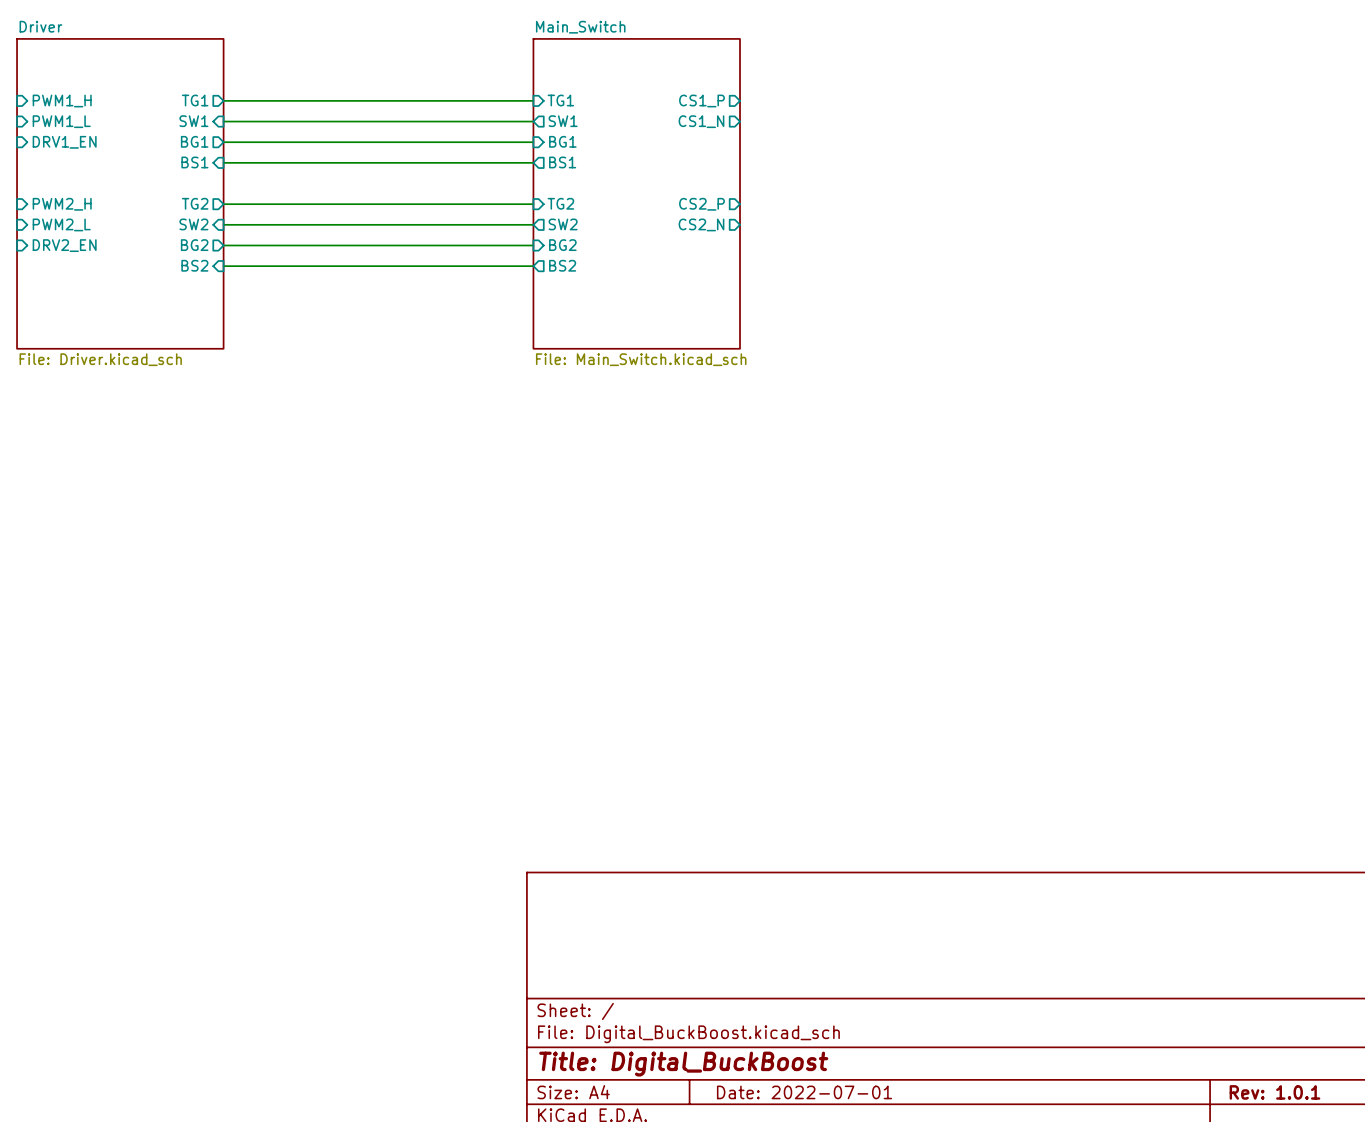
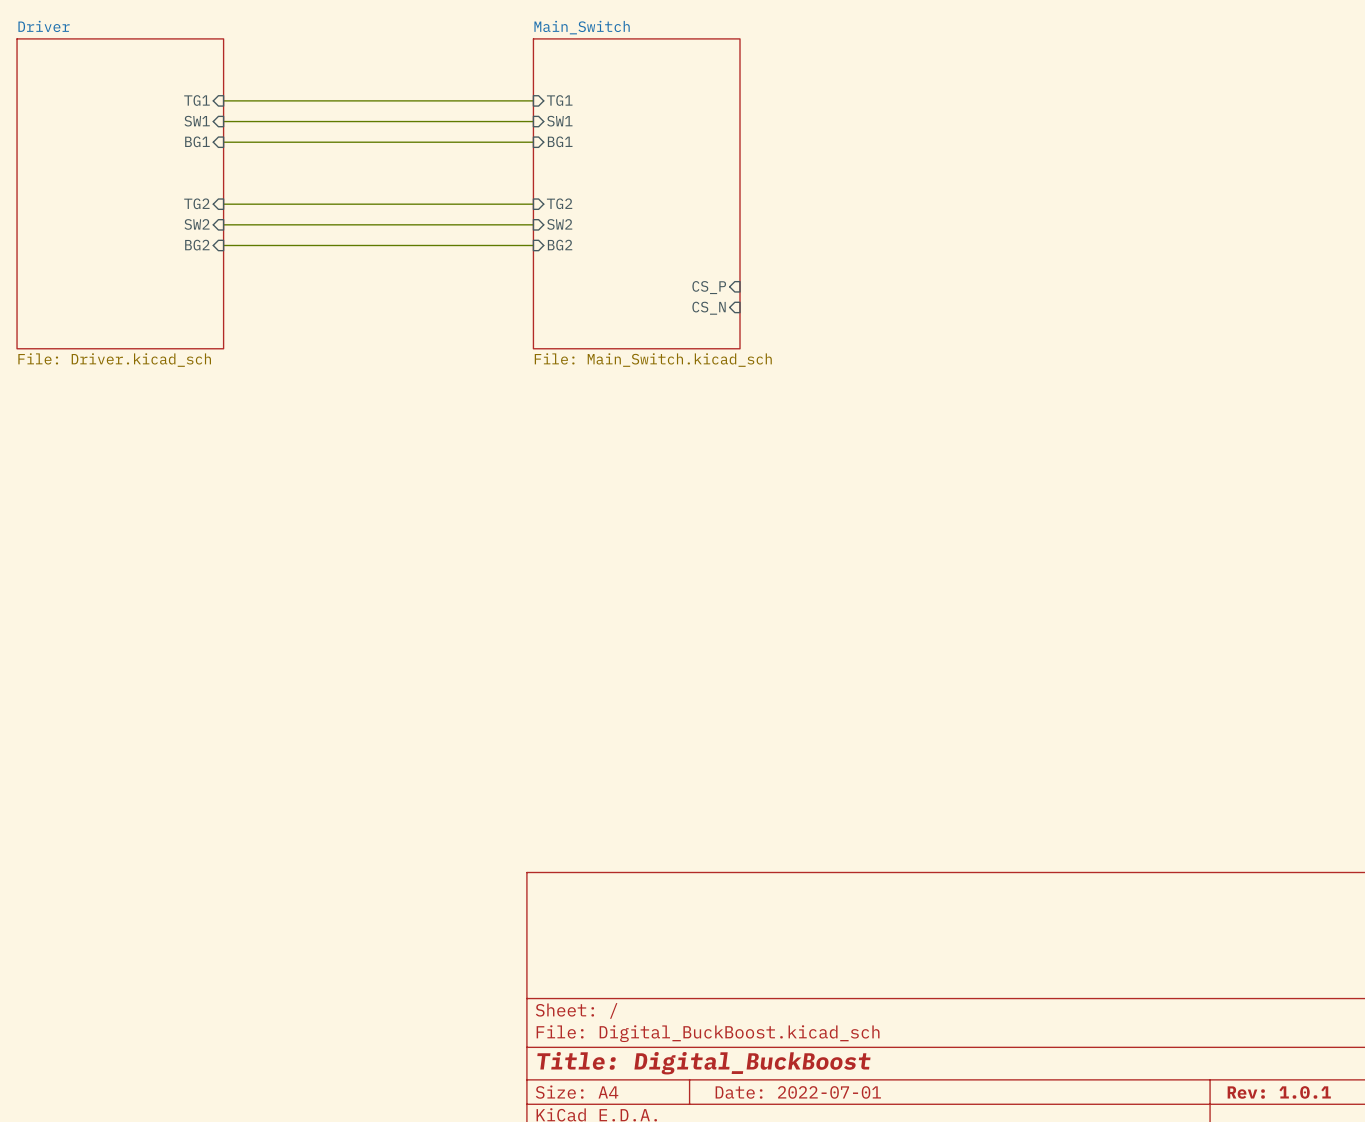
sheet pin shape: output (195, 100) -> input (196, 100)
sheet pin: PWM1_H (62, 101) -> none
sheet pin: CS1_P (701, 101) -> none
sheet pin: PWM1_L (61, 121) -> none
sheet pin shape: output (563, 121) -> input (559, 121)
sheet pin: CS1_N (701, 121) -> none
sheet pin shape: output (194, 141) -> input (197, 141)
sheet pin: DRV1_EN (64, 142) -> none
sheet pin: BS1 (194, 162) -> none
wire: (223, 162) (533, 162) -> none
sheet pin: BS1 (562, 162) -> none
sheet pin shape: output (195, 203) -> input (196, 203)
sheet pin: PWM2_H (62, 204) -> none
sheet pin: CS2_P (701, 204) -> none
sheet pin: PWM2_L (61, 224) -> none
sheet pin shape: output (563, 224) -> input (559, 224)
sheet pin: CS2_N (701, 224) -> none
sheet pin: DRV2_EN (64, 245) -> none
sheet pin shape: output (194, 245) -> input (197, 245)
sheet pin: BS2 (194, 265) -> none
sheet pin: BS2 (562, 265) -> none
wire: (223, 266) (533, 266) -> none
sheet pin: none -> CS_P (709, 287)
sheet pin: none -> CS_N (709, 308)

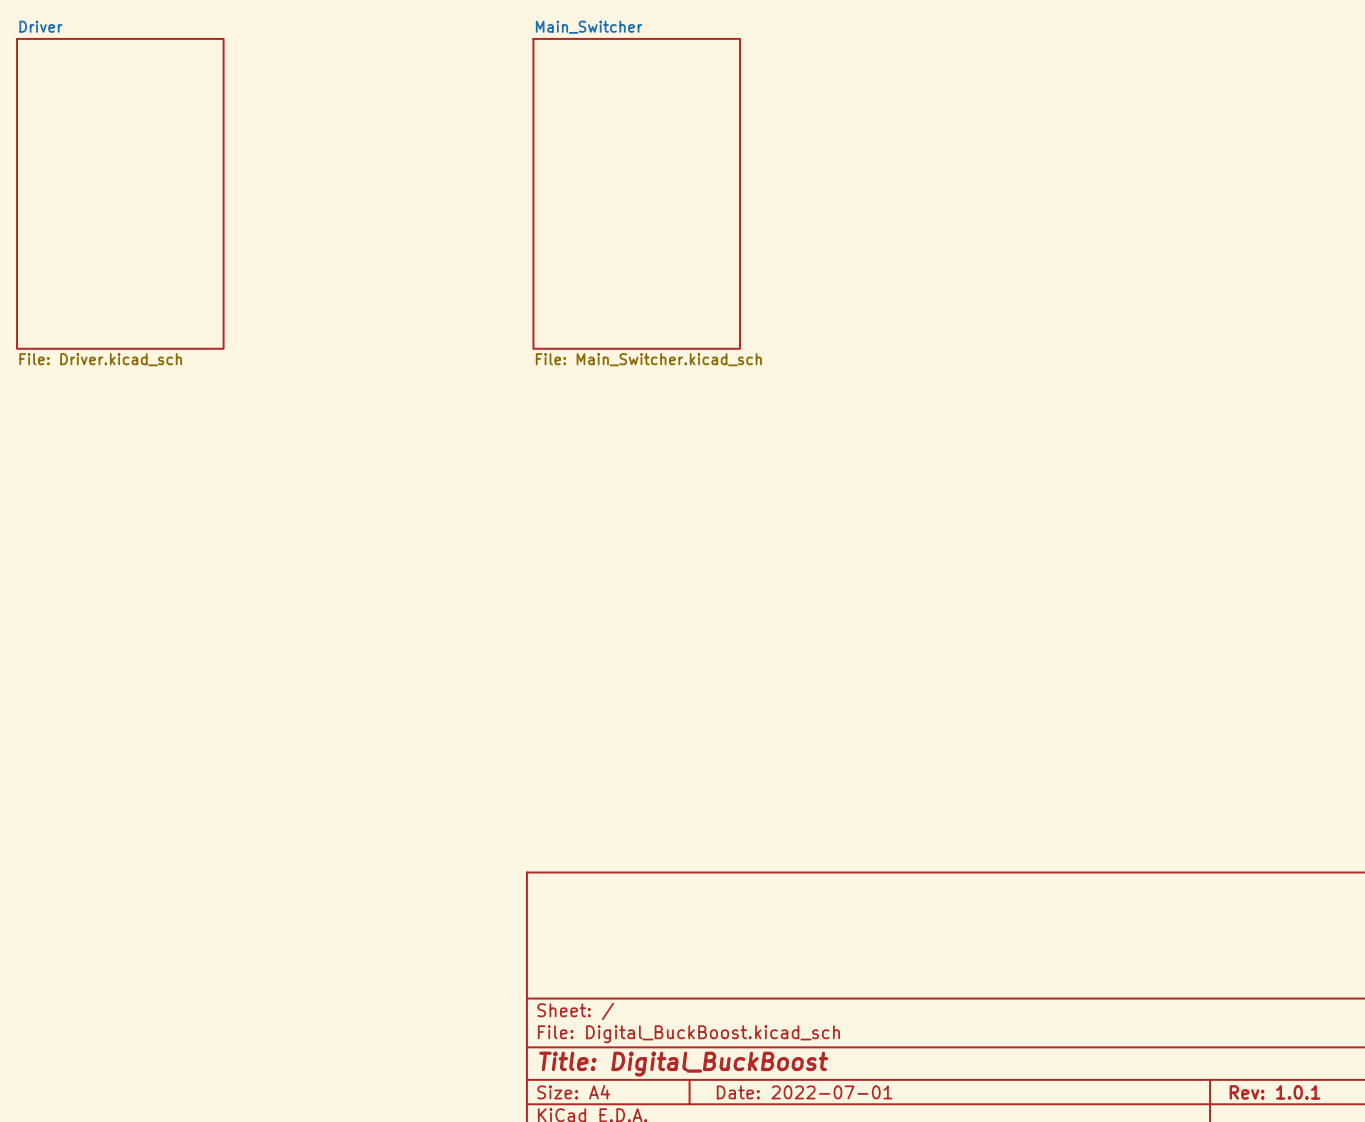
sheet Main_Switch name: Main_Switch (582, 27) -> Main_Switcher (589, 27)
sheet pin: TG1 (196, 100) -> none
wire: (223, 100) (533, 100) -> none
sheet pin: TG1 (559, 100) -> none
sheet pin: SW1 (197, 121) -> none
wire: (223, 121) (533, 121) -> none
sheet pin: SW1 (559, 121) -> none
sheet pin: BG1 (197, 141) -> none
sheet pin: BG1 (560, 141) -> none
wire: (223, 142) (533, 142) -> none
sheet pin: TG2 (196, 203) -> none
sheet pin: TG2 (559, 203) -> none
wire: (223, 204) (533, 204) -> none
sheet pin: SW2 (197, 224) -> none
wire: (223, 224) (533, 224) -> none
sheet pin: SW2 (559, 224) -> none
sheet pin: BG2 (197, 245) -> none
wire: (223, 245) (533, 245) -> none
sheet pin: BG2 (560, 245) -> none
sheet pin: CS_P (709, 287) -> none
sheet pin: CS_N (709, 308) -> none
sheet Main_Switch value: File: Main_Switch.kicad_sch (653, 360) -> File: Main_Switcher.kicad_sch (648, 359)

